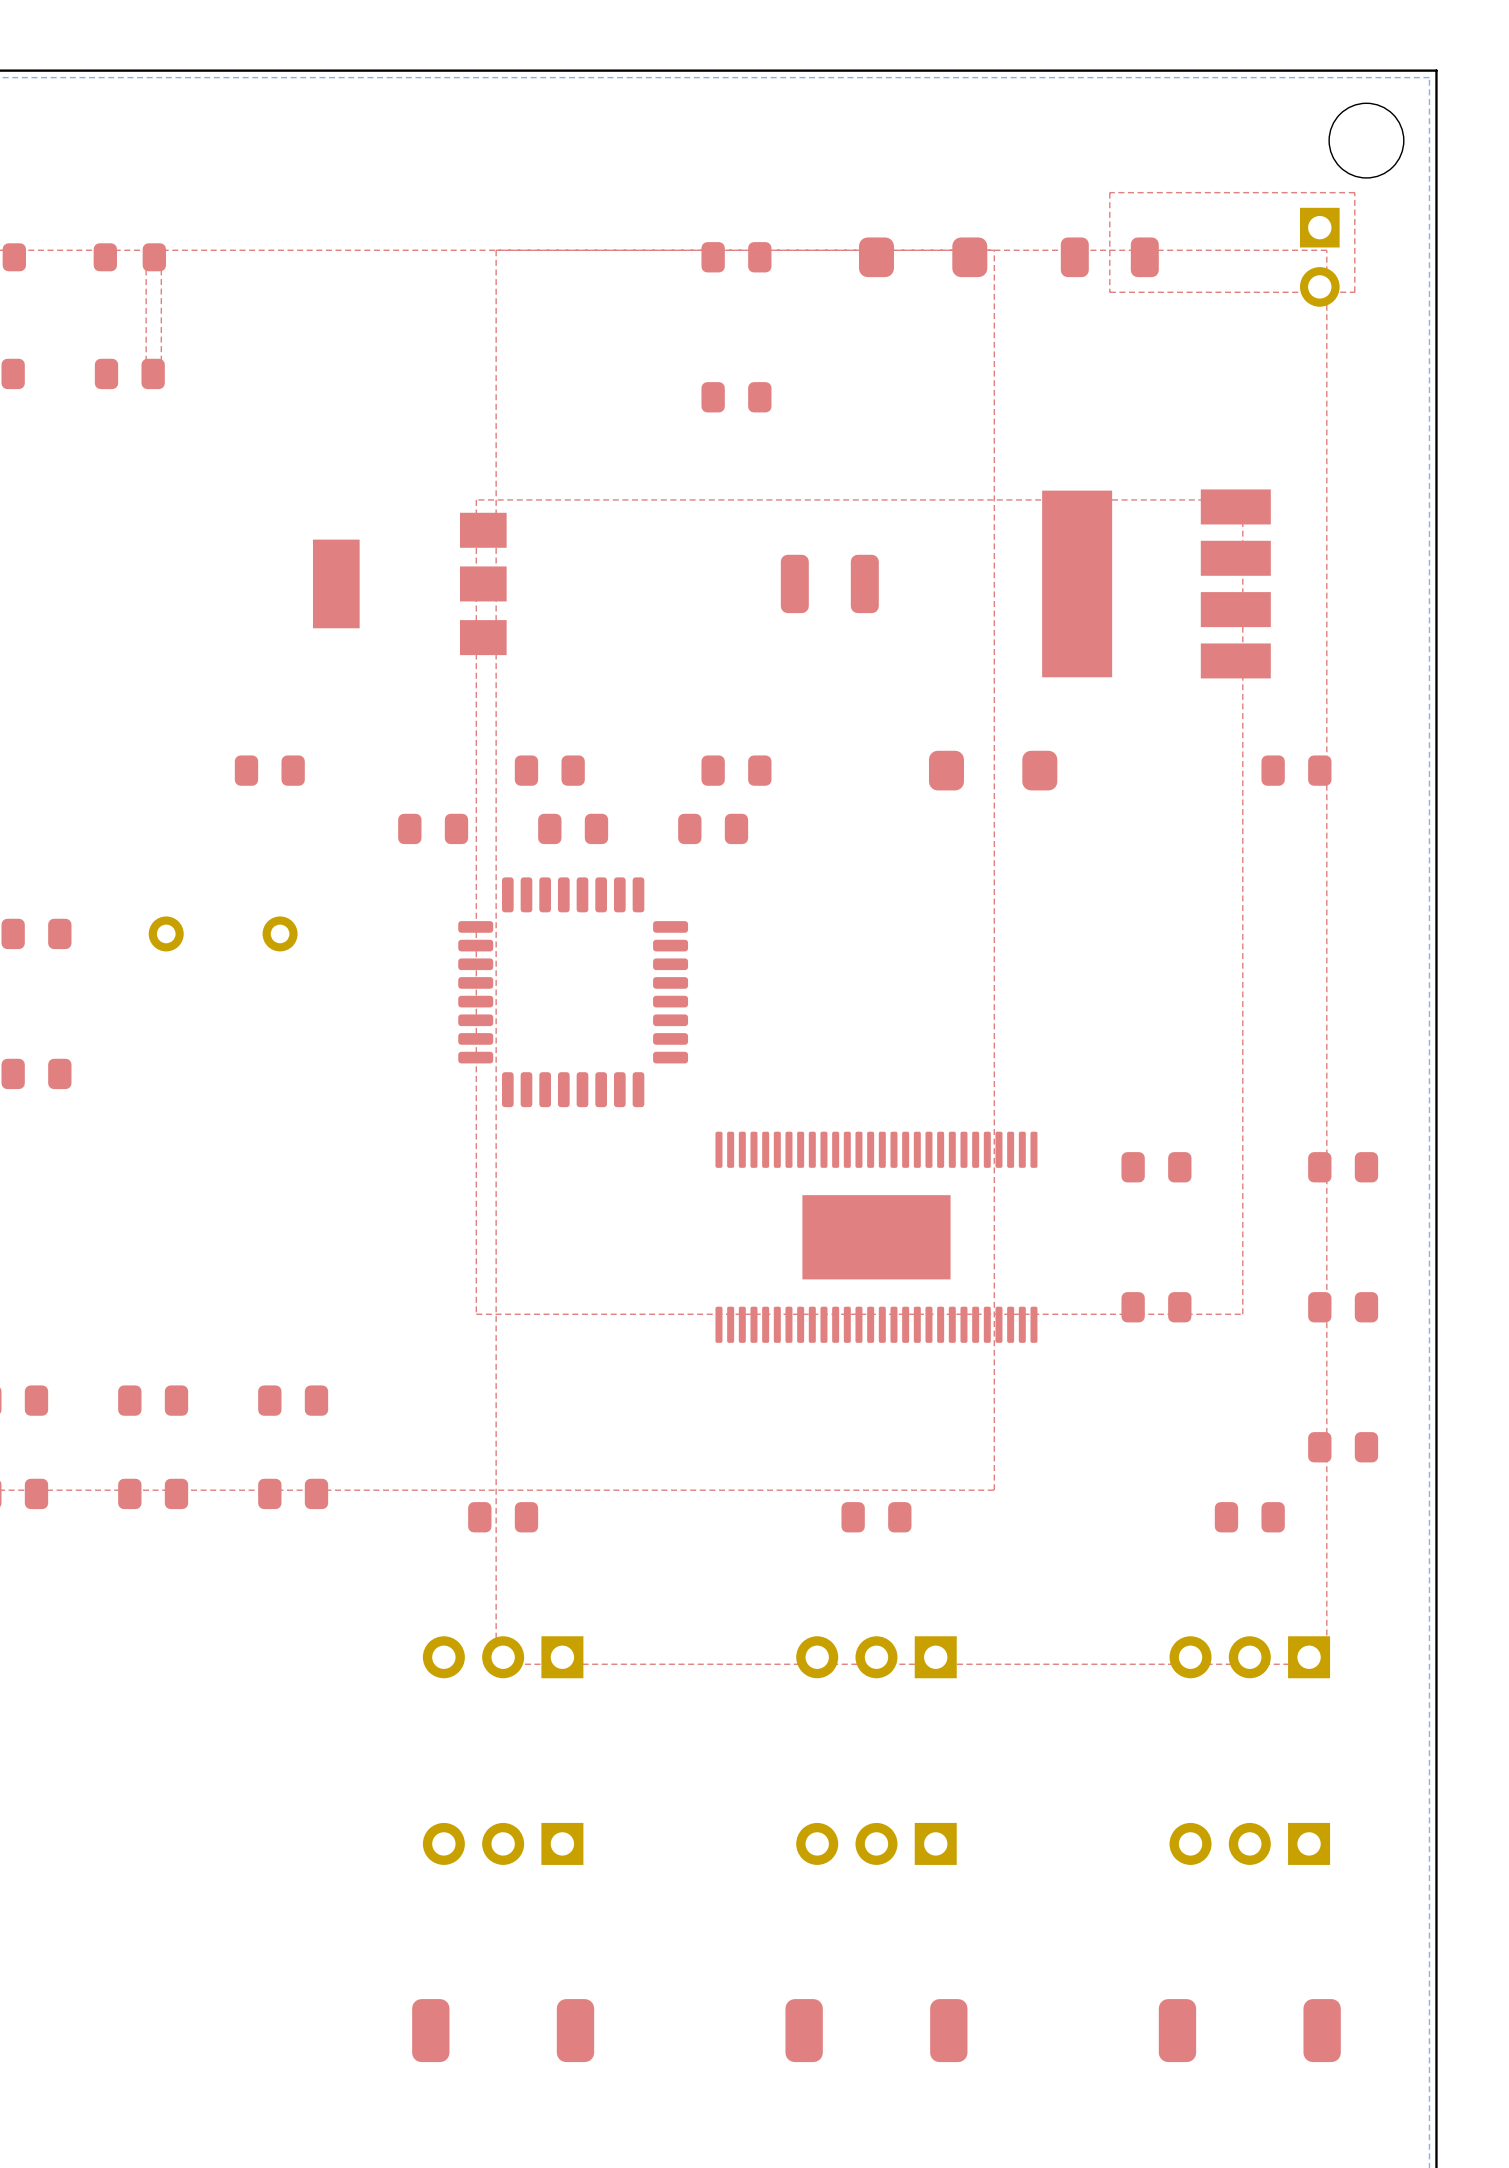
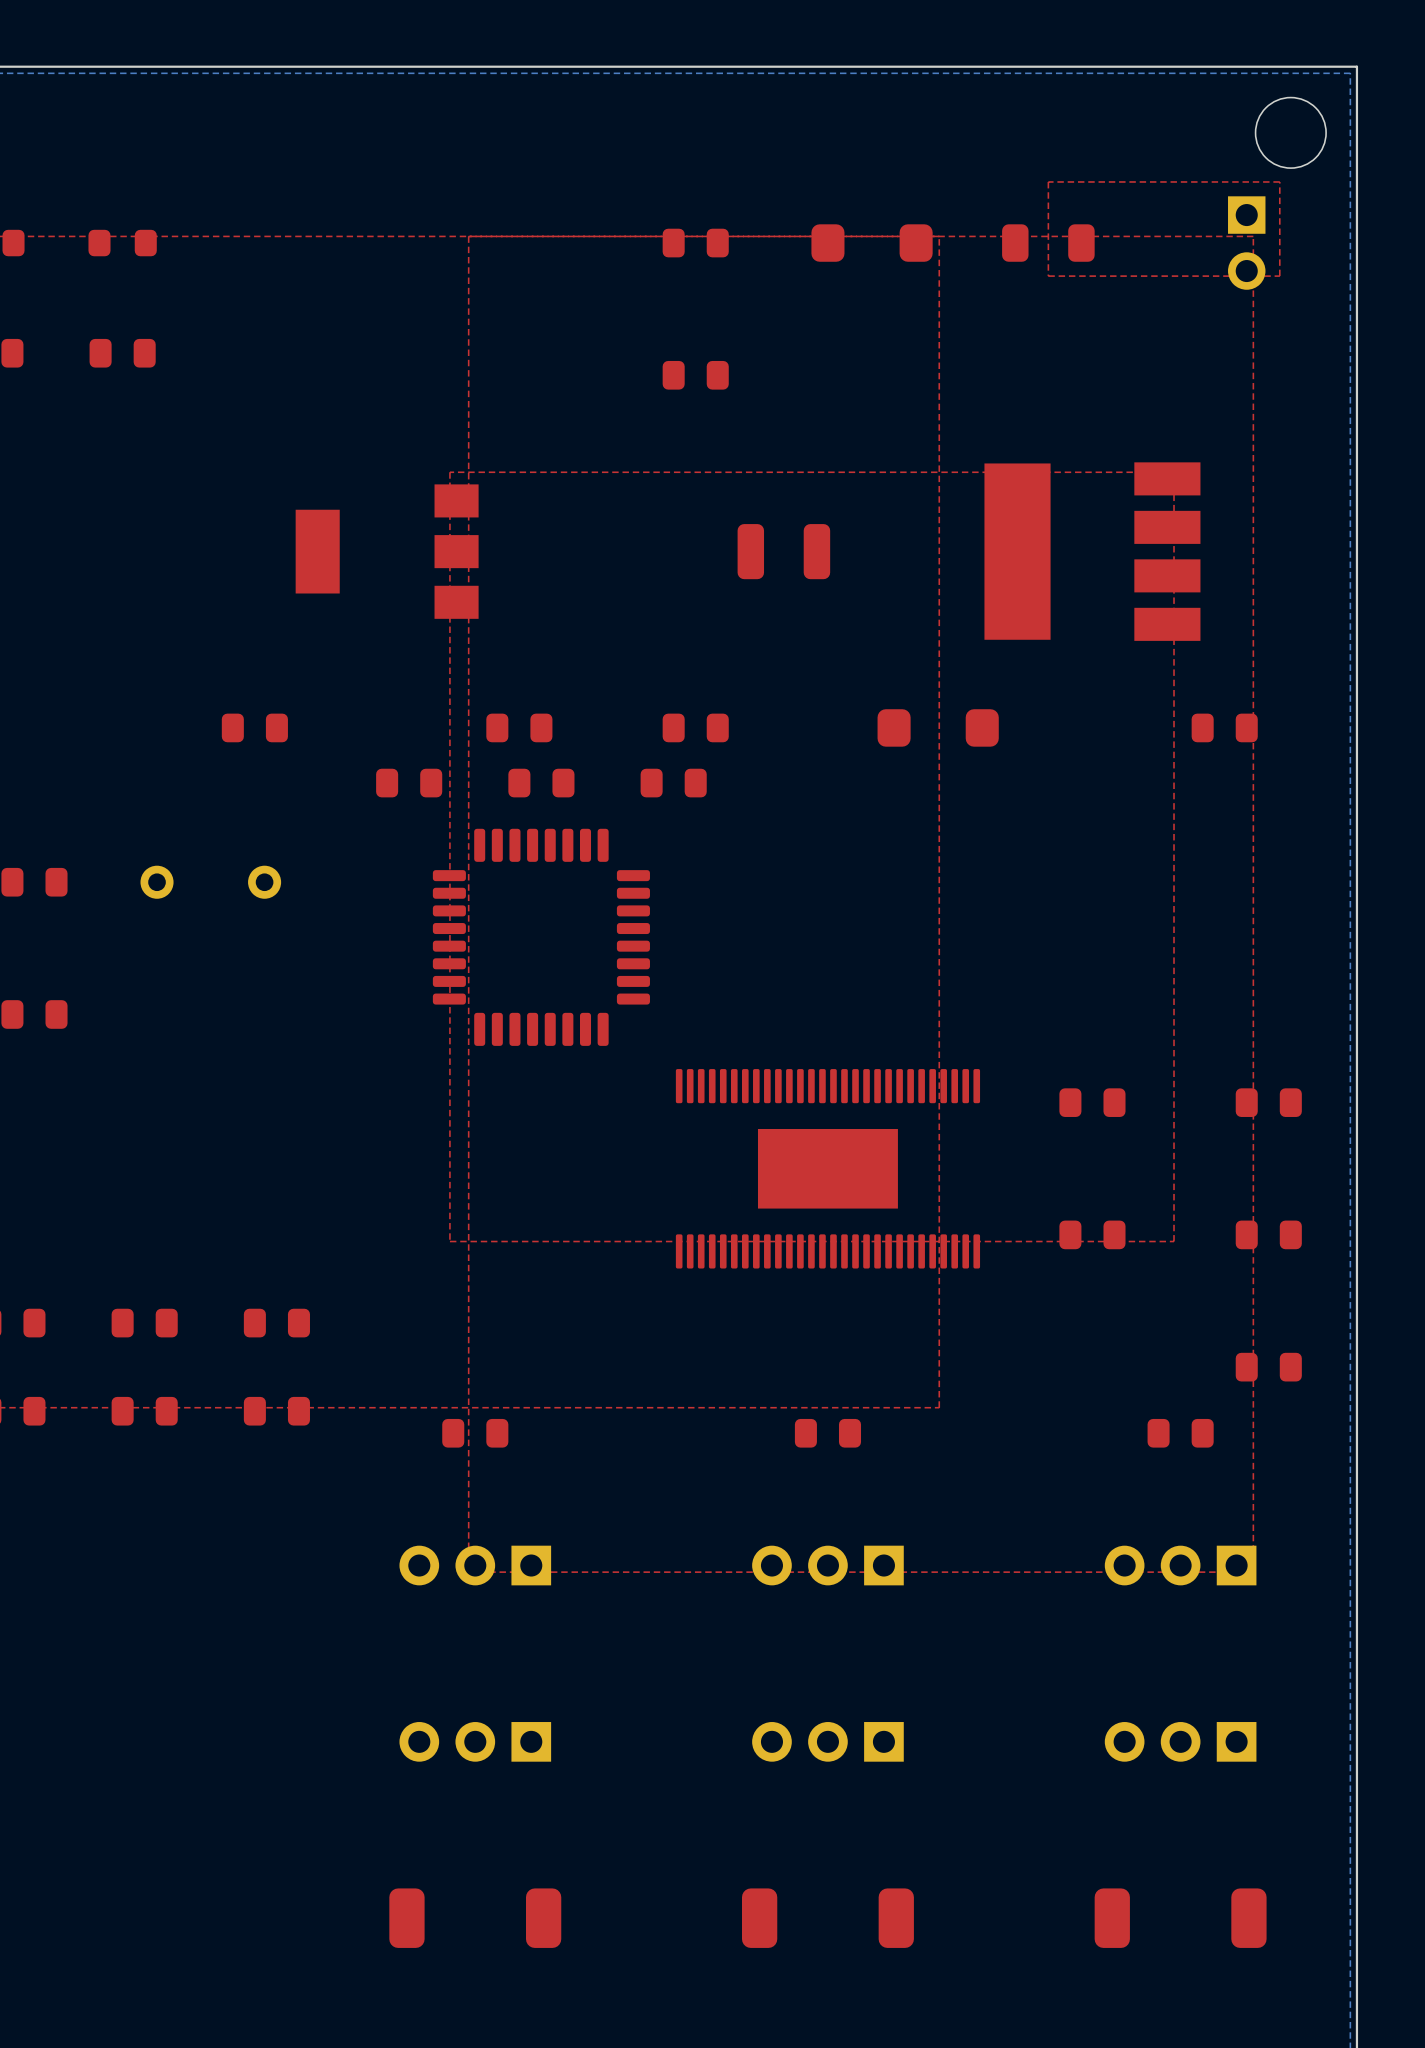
top zone outline: (161, 250) (161, 380) (146, 380) (146, 250) -> none

